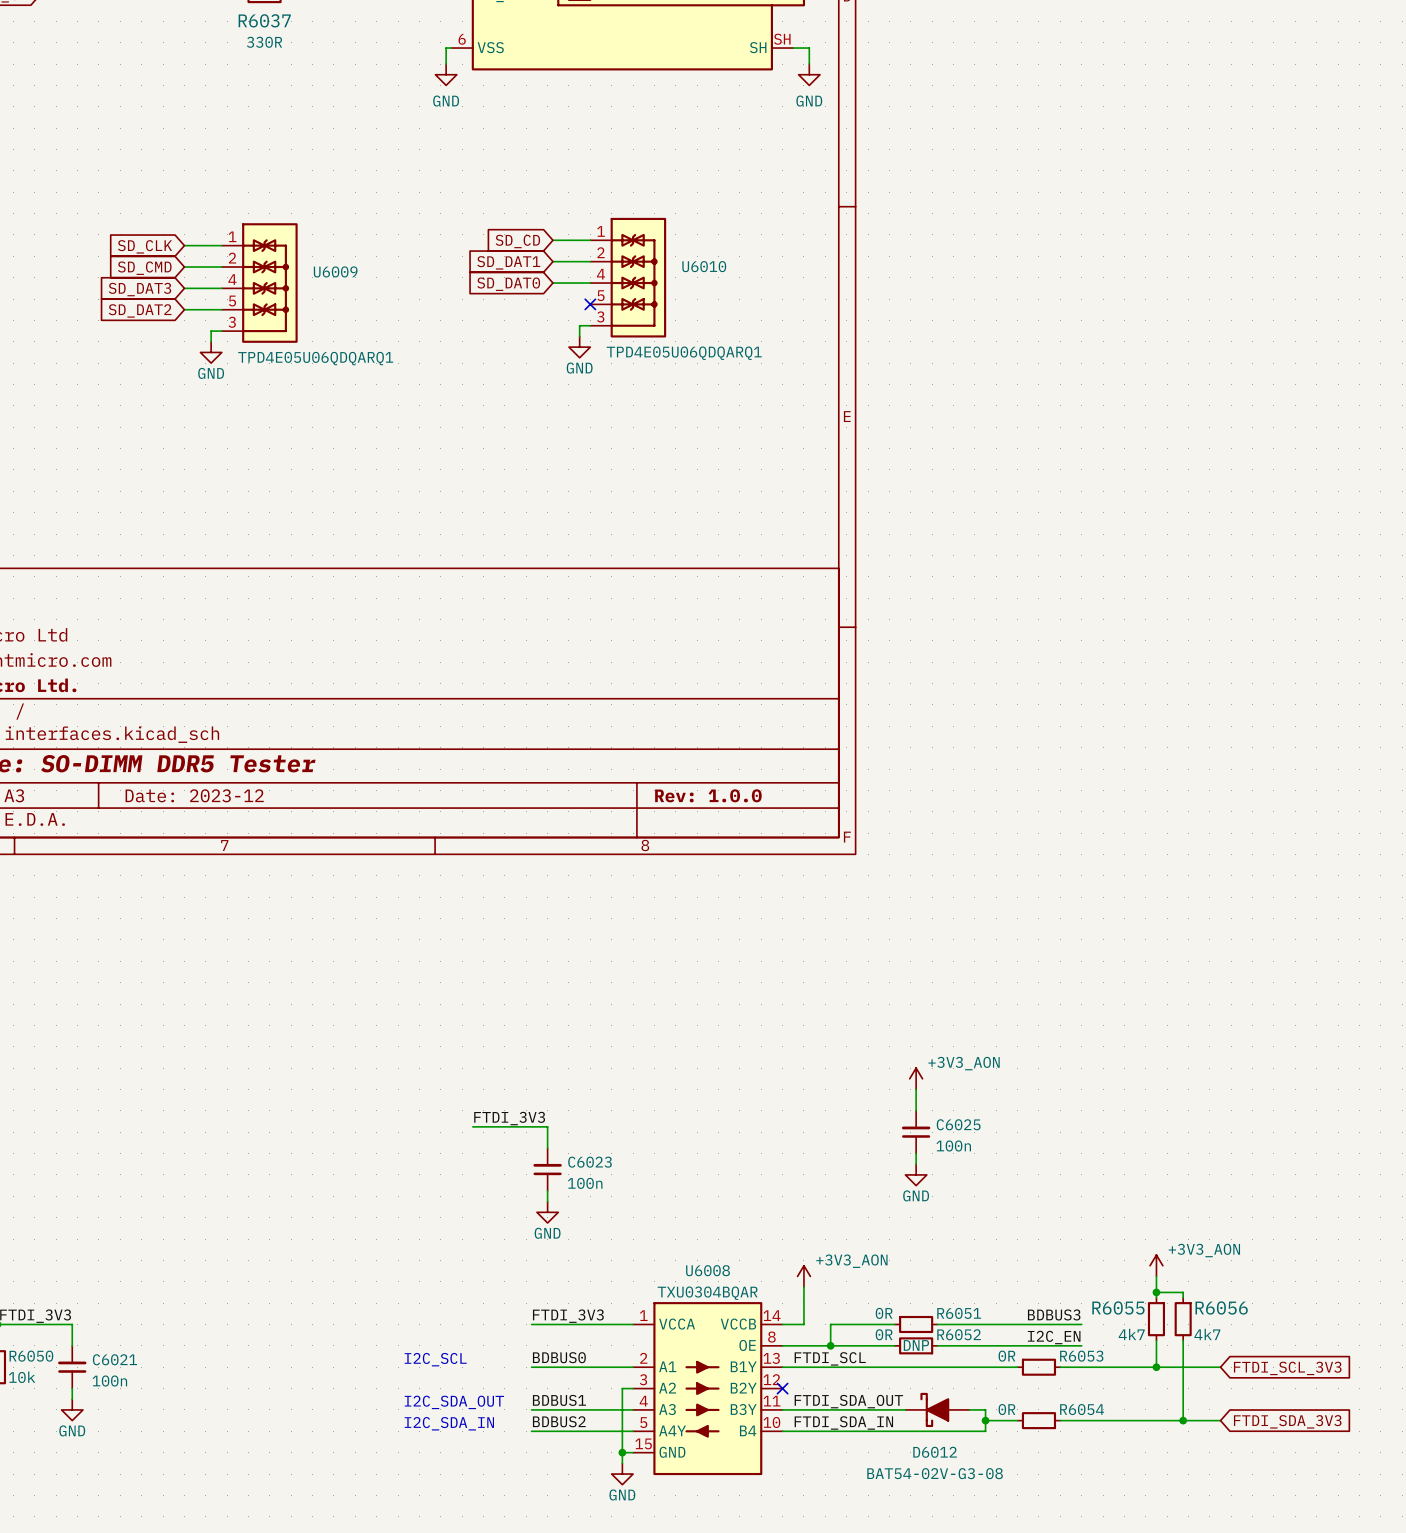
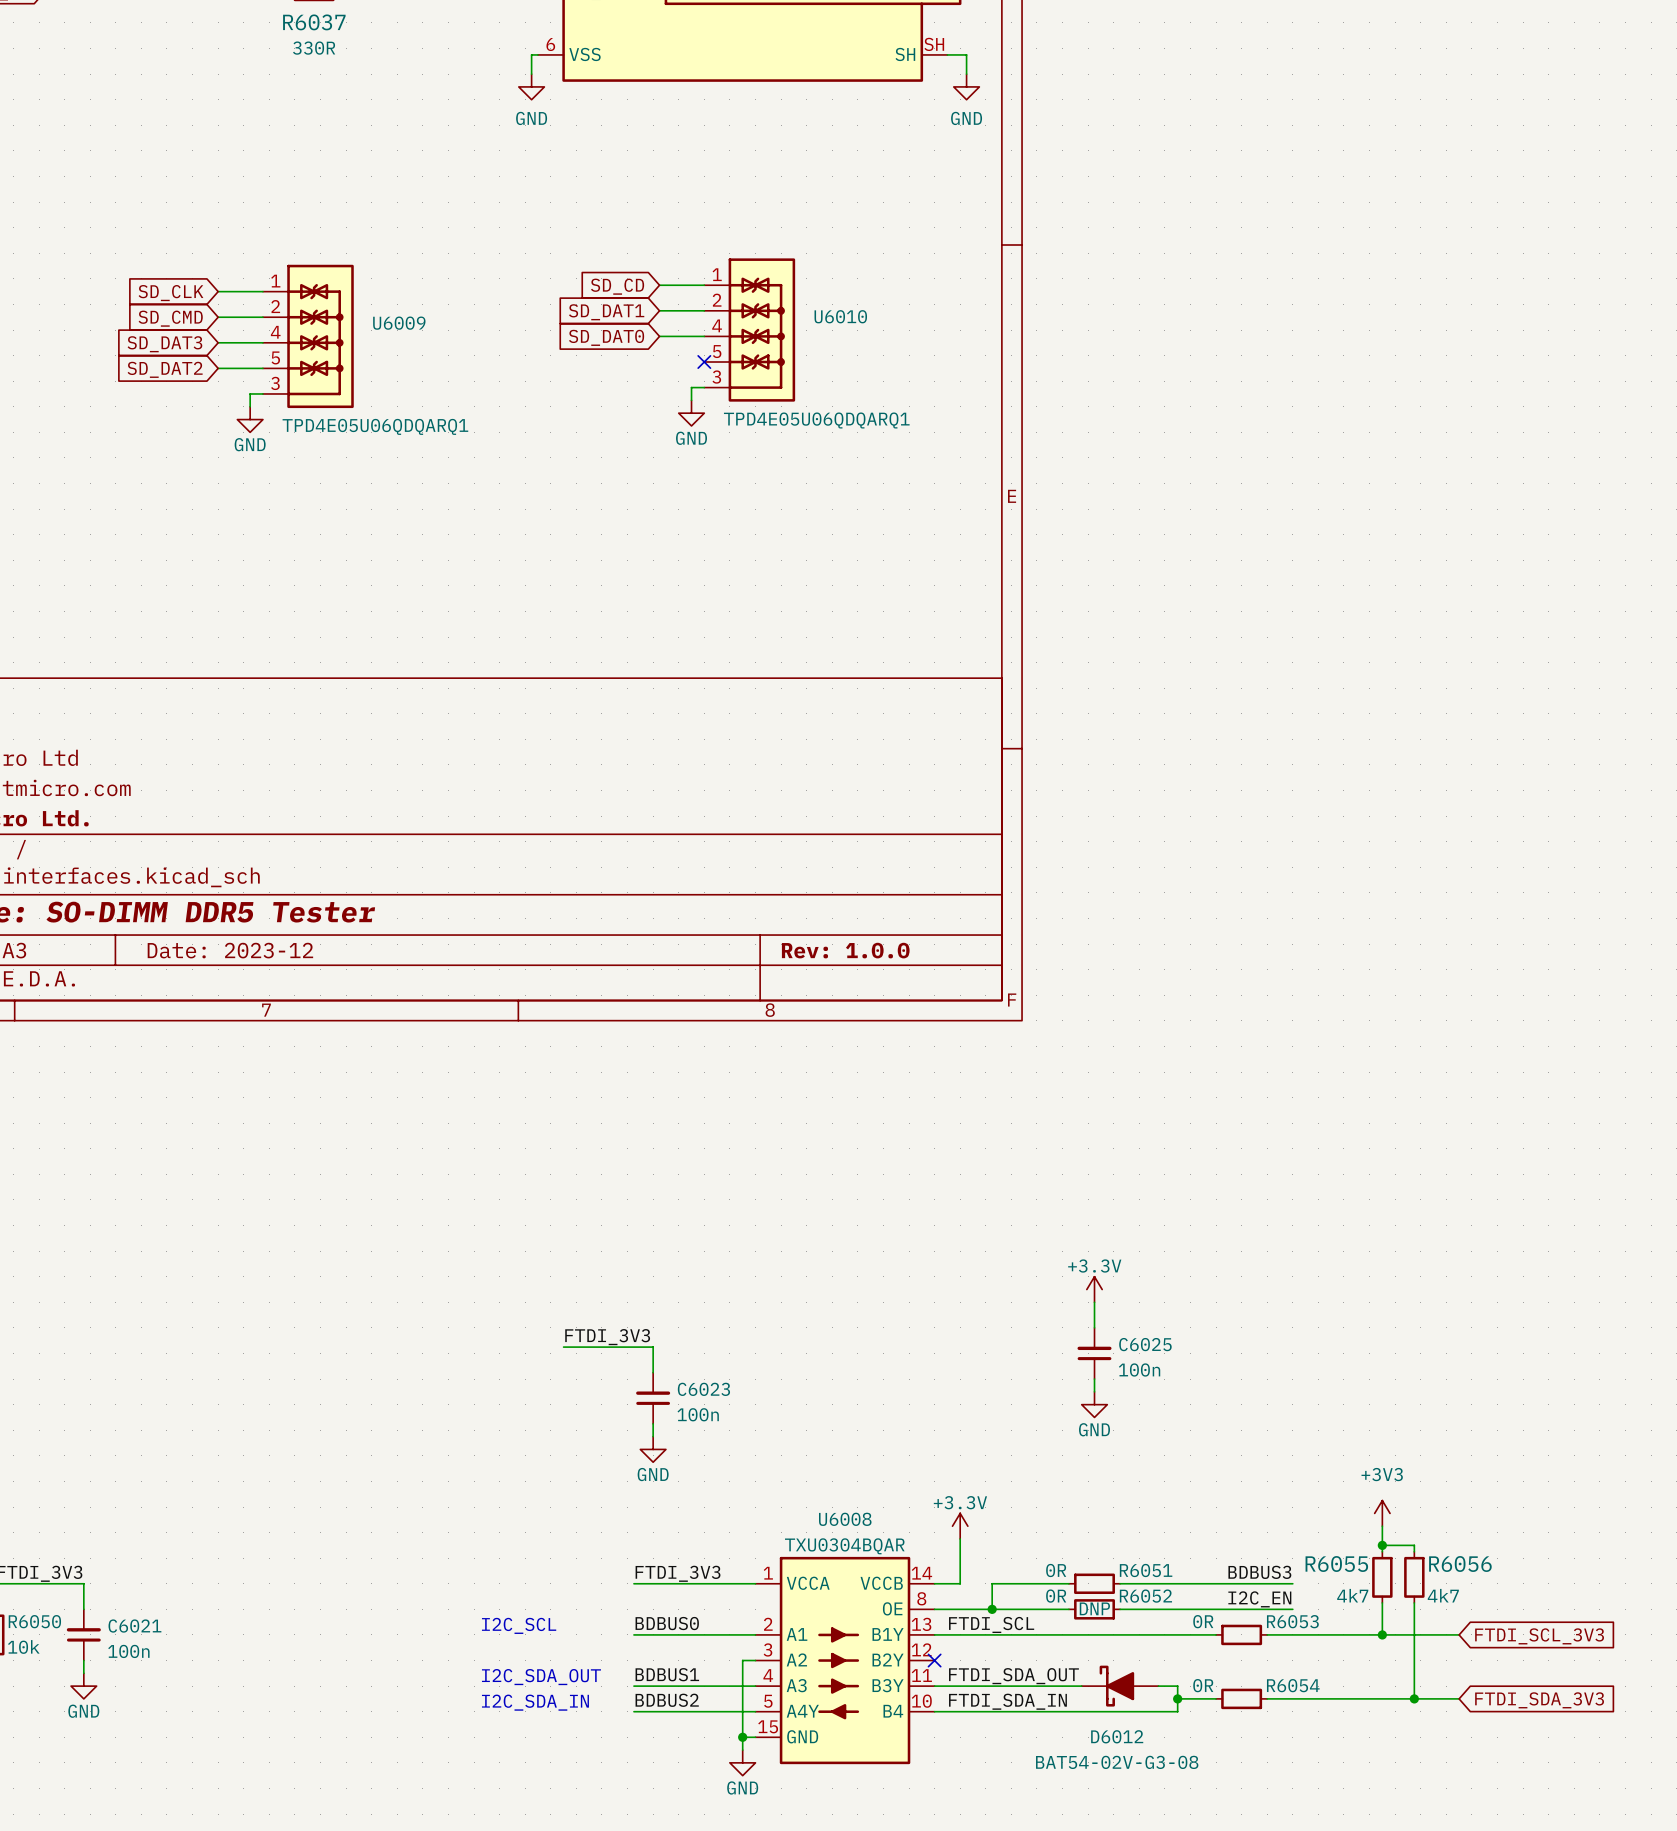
power symbol: +3V3_AON (916, 1078) -> +3.3V (1094, 1289)
power symbol: +3V3_AON (1156, 1265) -> +3V3 (1382, 1513)
power symbol: +3V3_AON (803, 1276) -> +3.3V (960, 1526)

